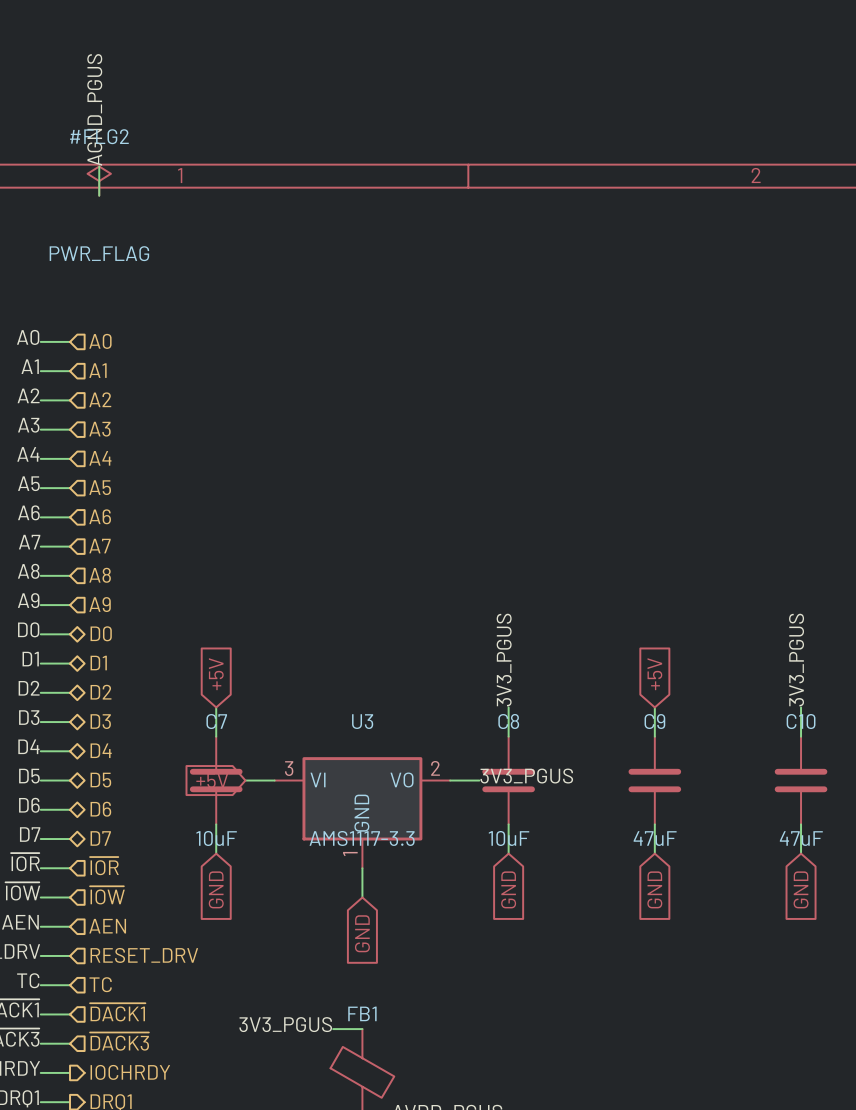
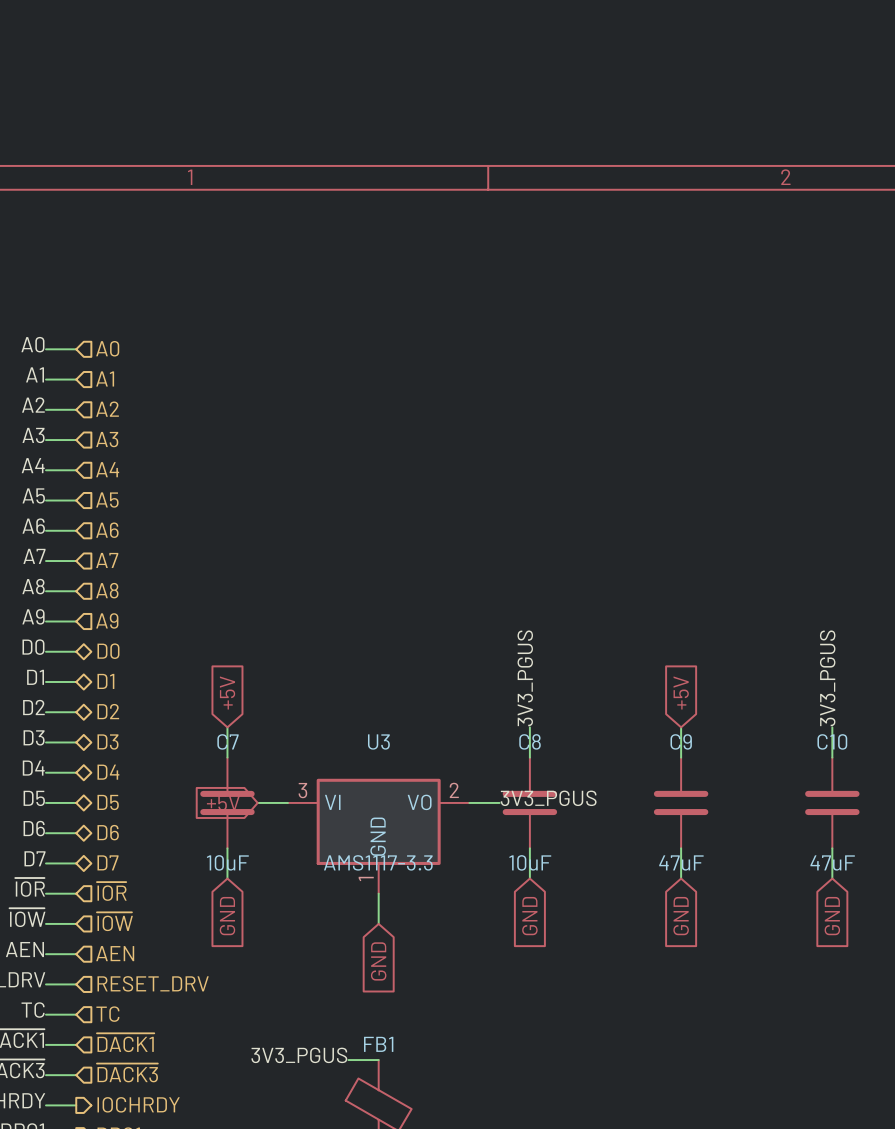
label: AGND_PGUS (94, 109) -> none
wire: (99, 166) (99, 195) -> none
#FLG2: PWR_FLAG (99, 181) -> none

